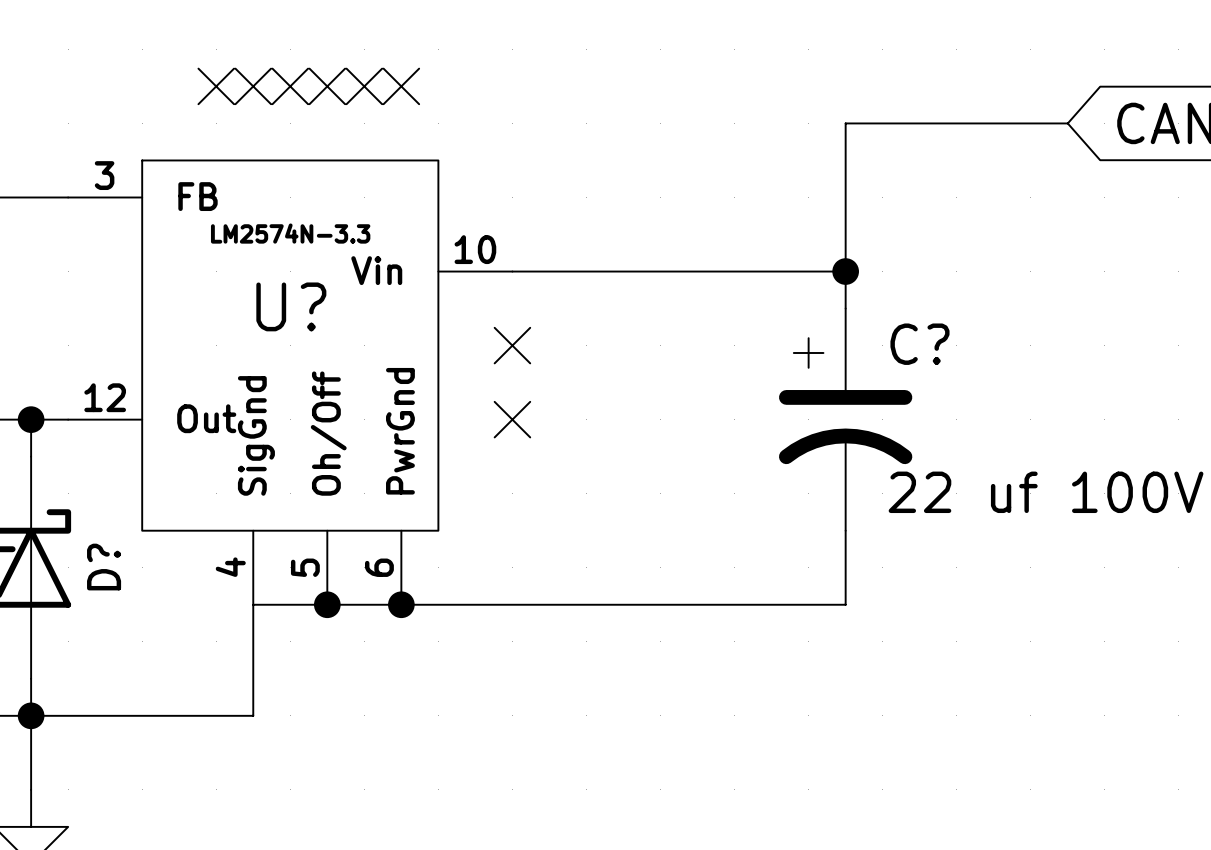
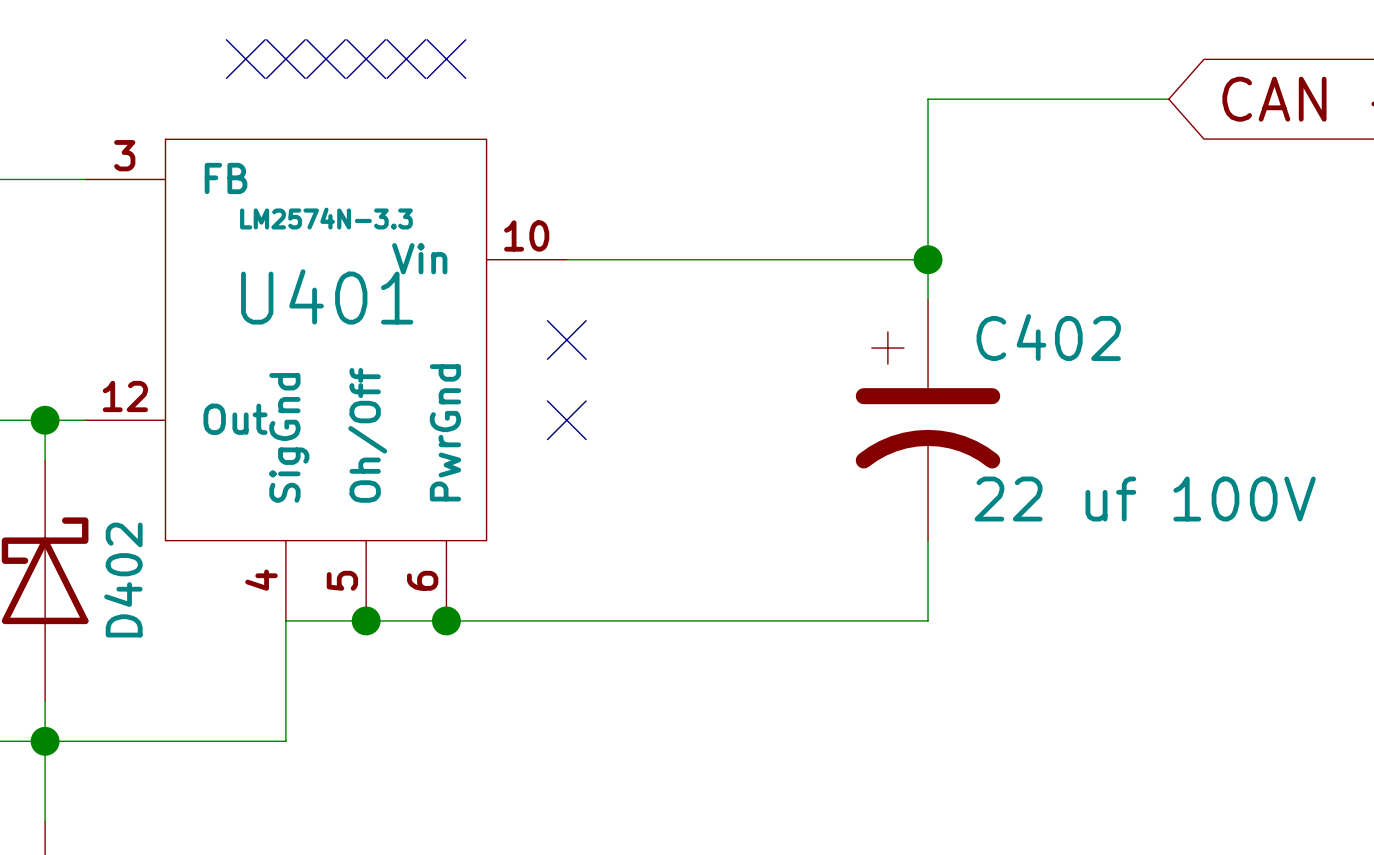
U? name: U? (291, 306) -> U401 (327, 296)
C? name: C? (919, 344) -> C402 (1048, 337)
D? name: D? (104, 567) -> D402 (123, 580)

